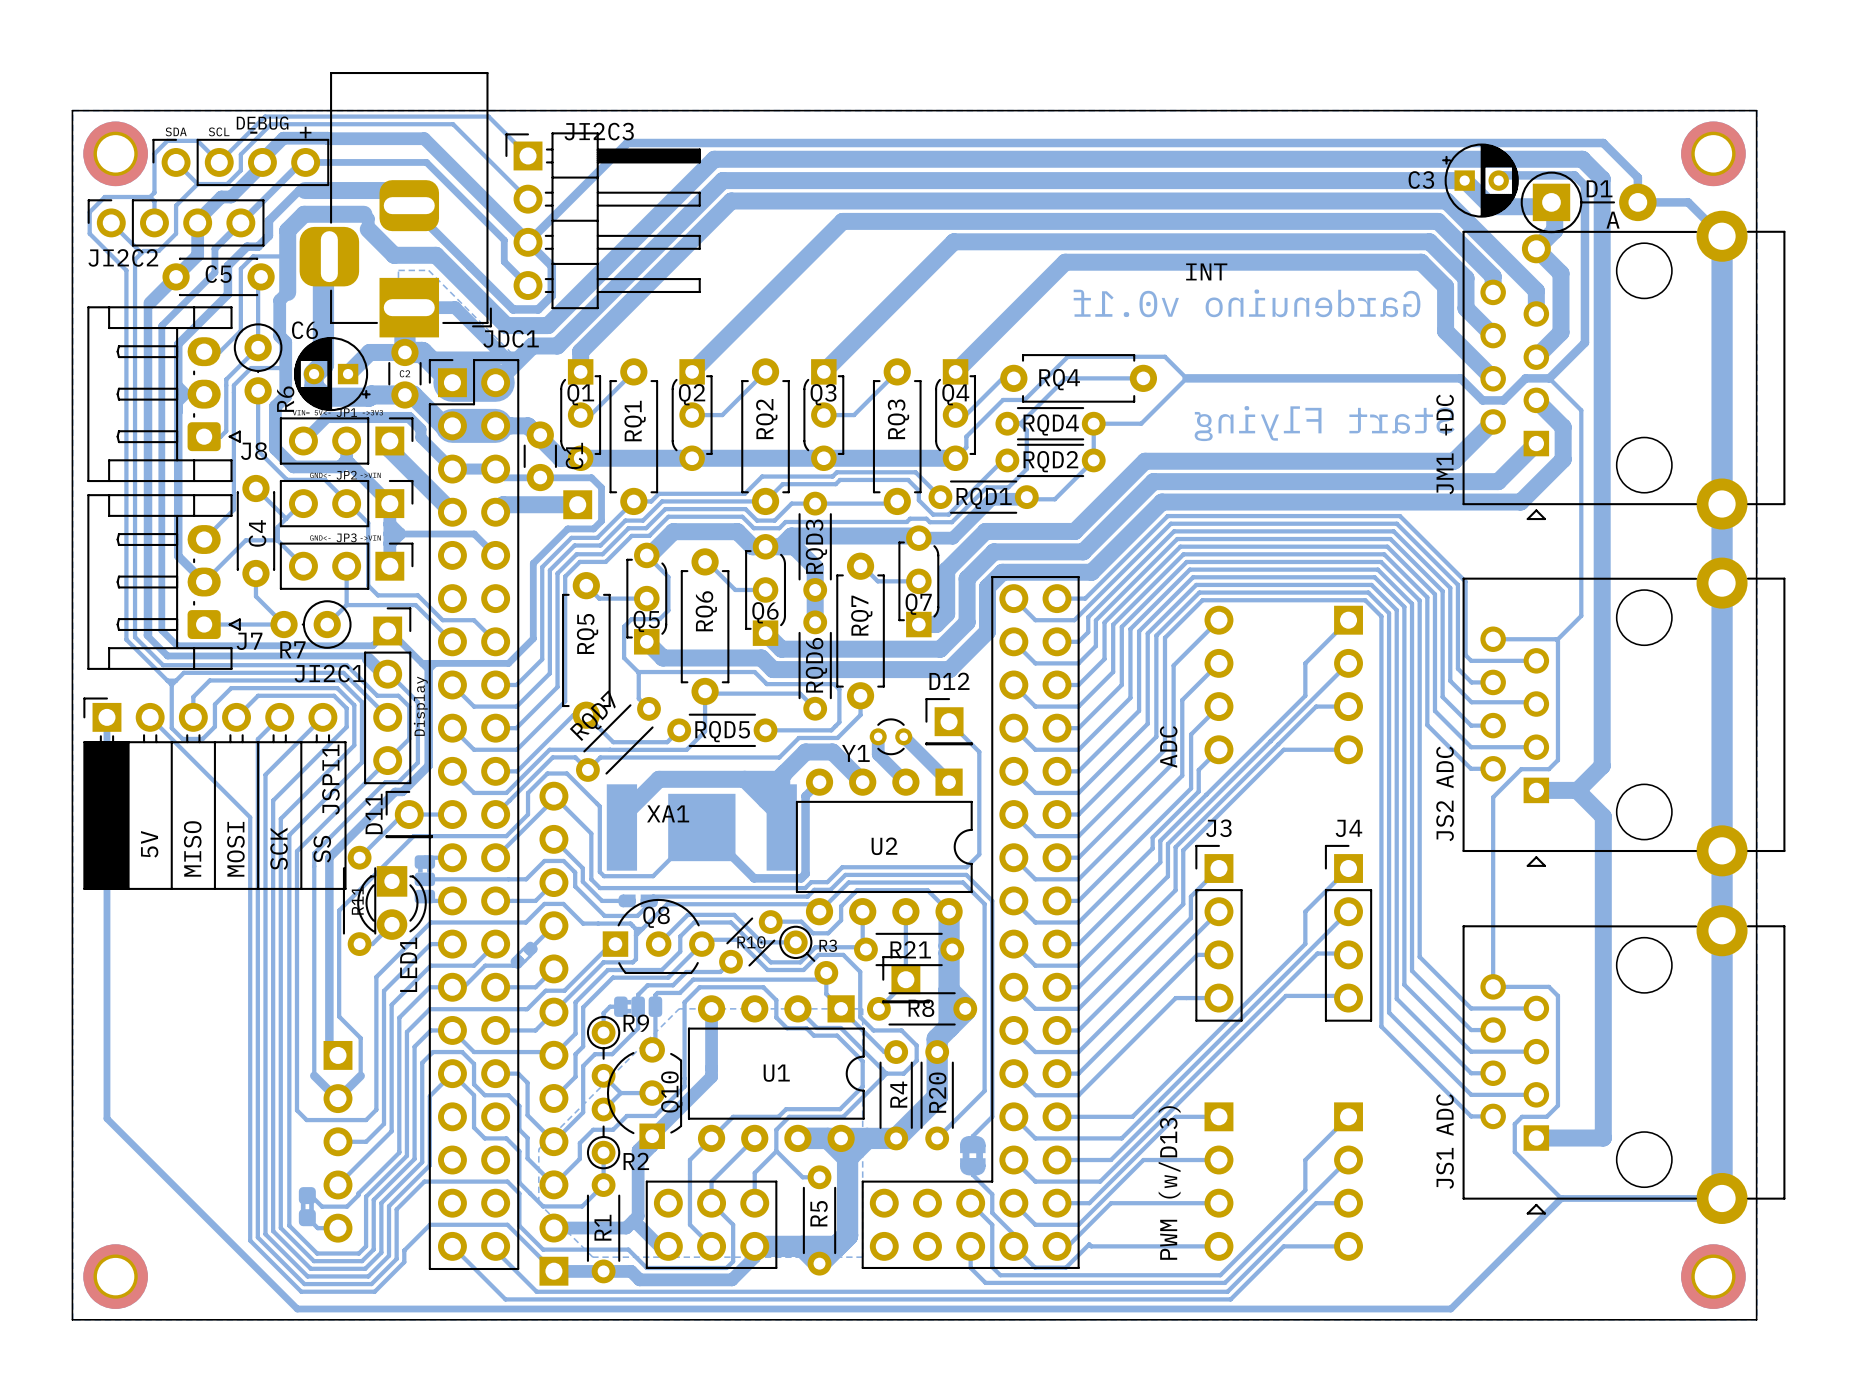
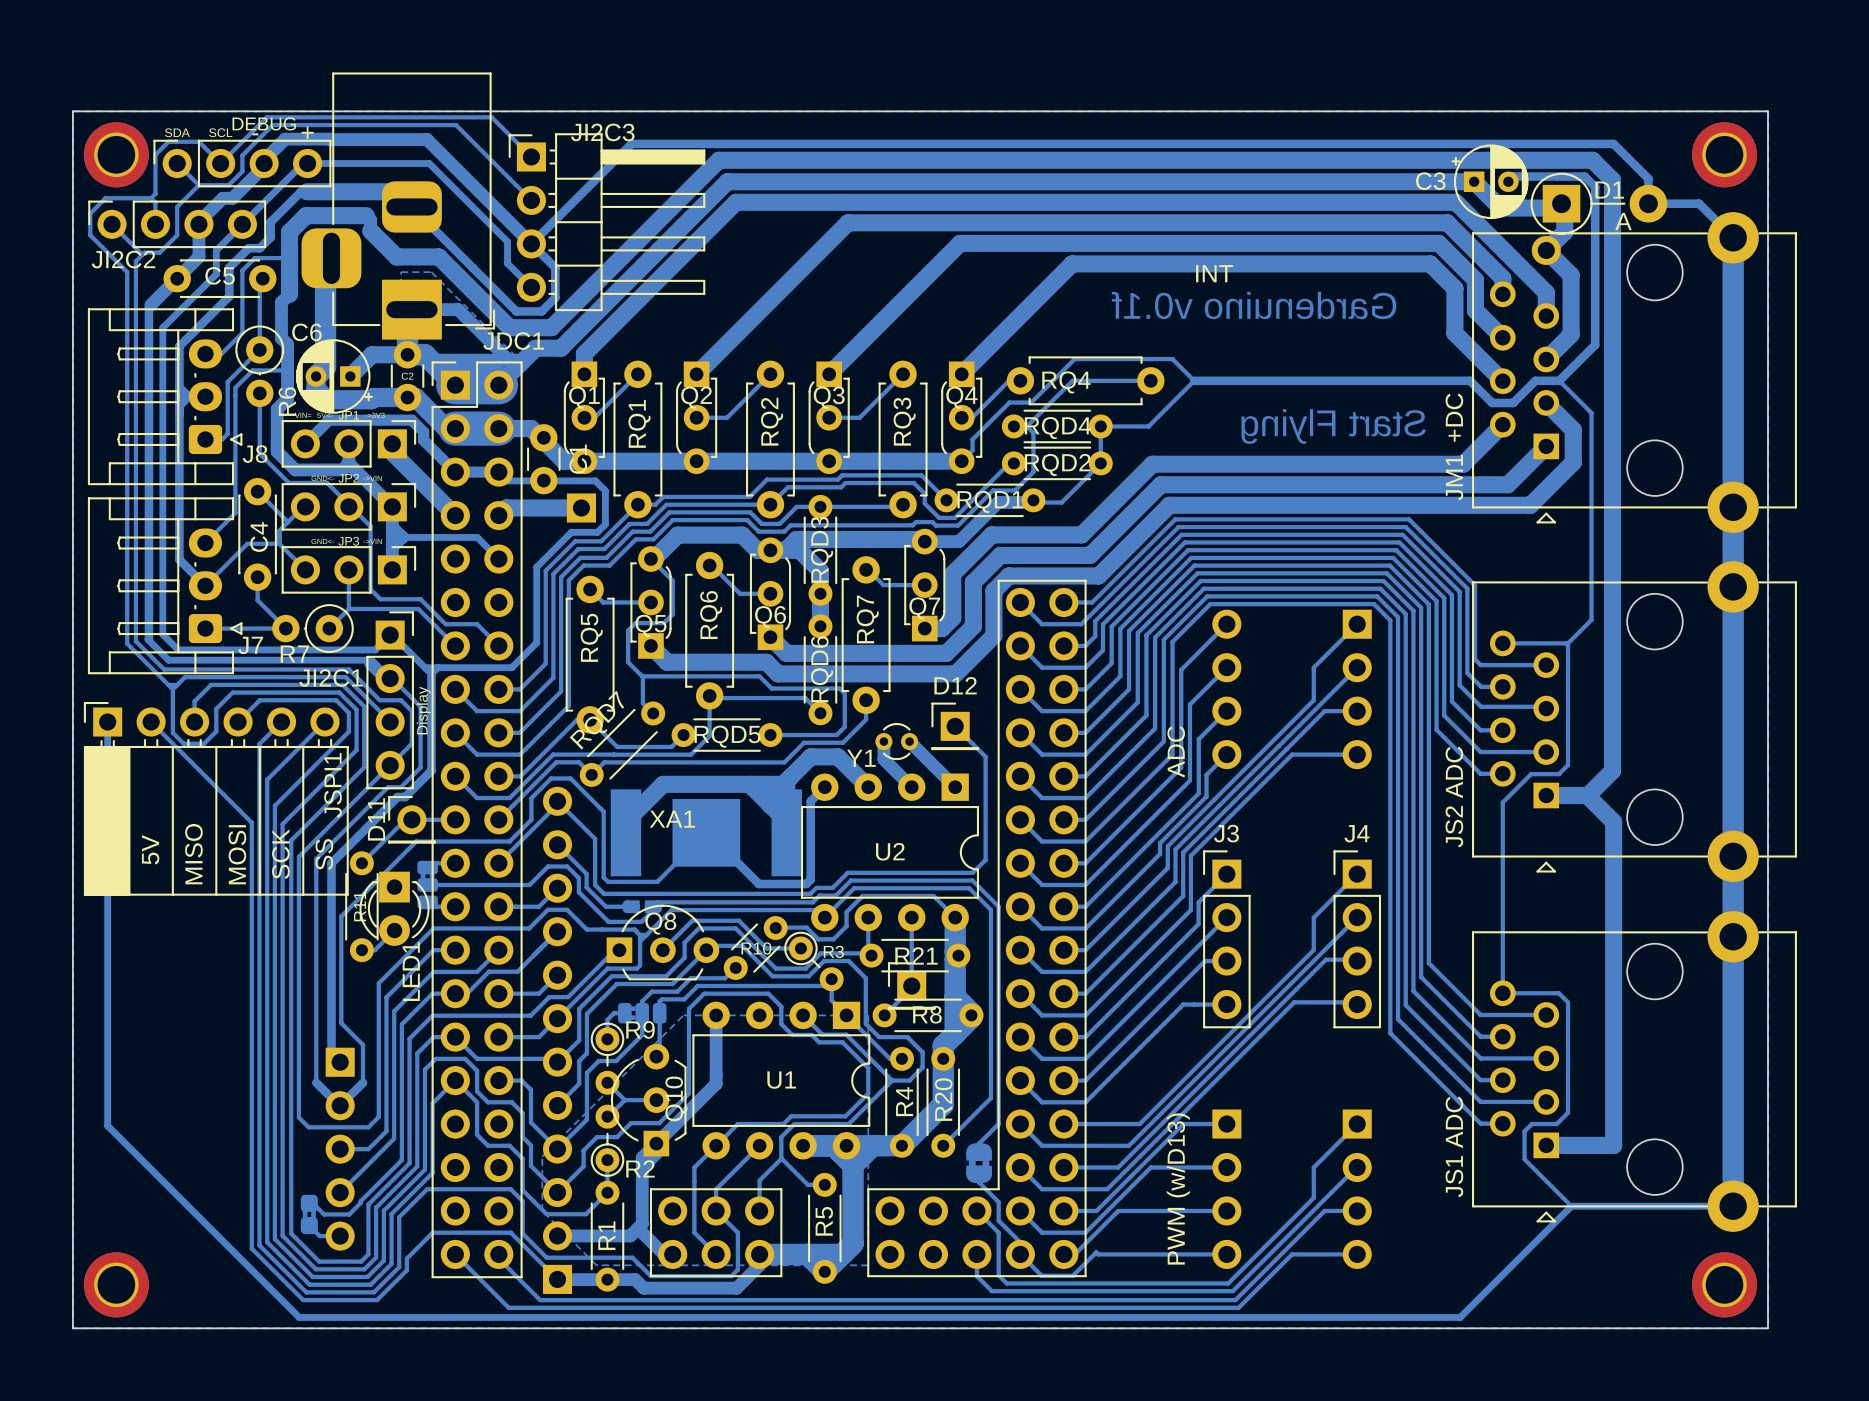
part: (524, 955) -> none
bottom track: (517, 961) (513, 965) (485, 965) (463, 987) -> (557, 931) (517, 971) (488, 971) (466, 993)

